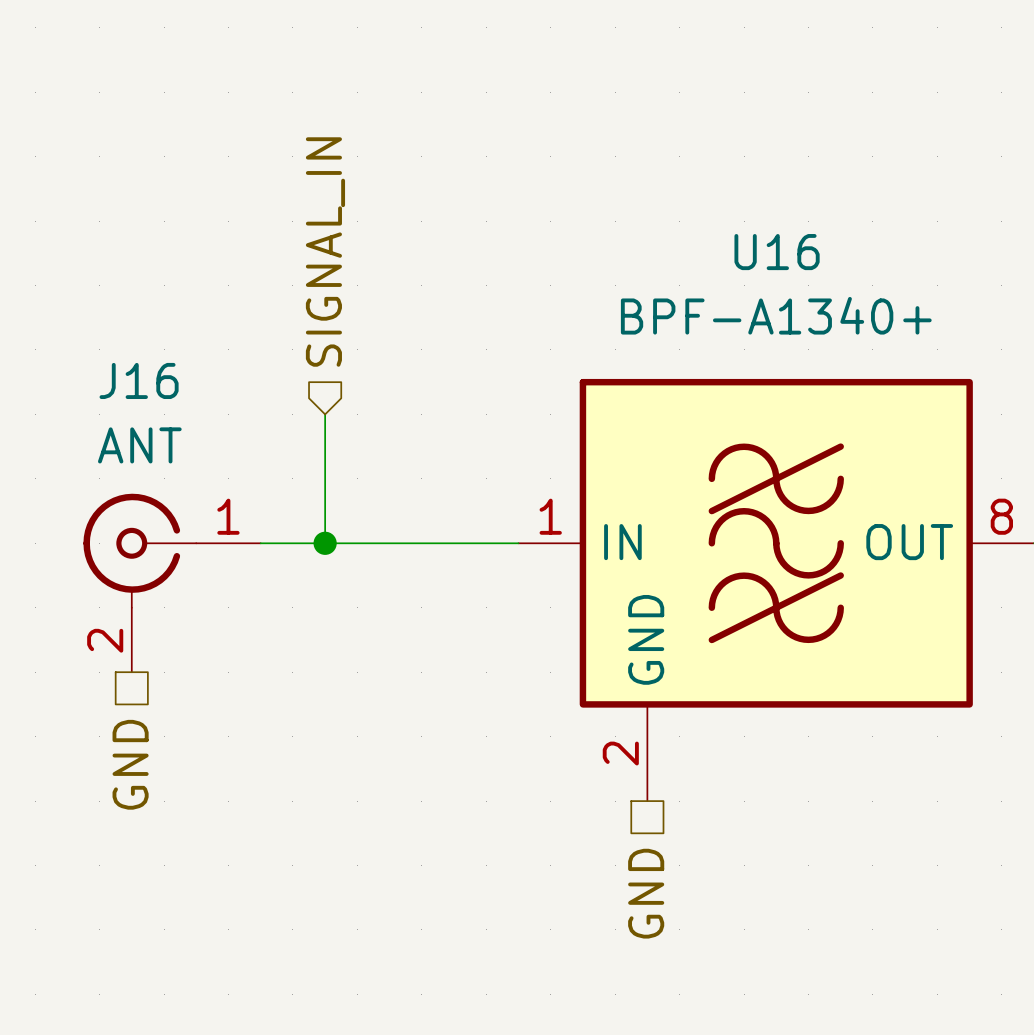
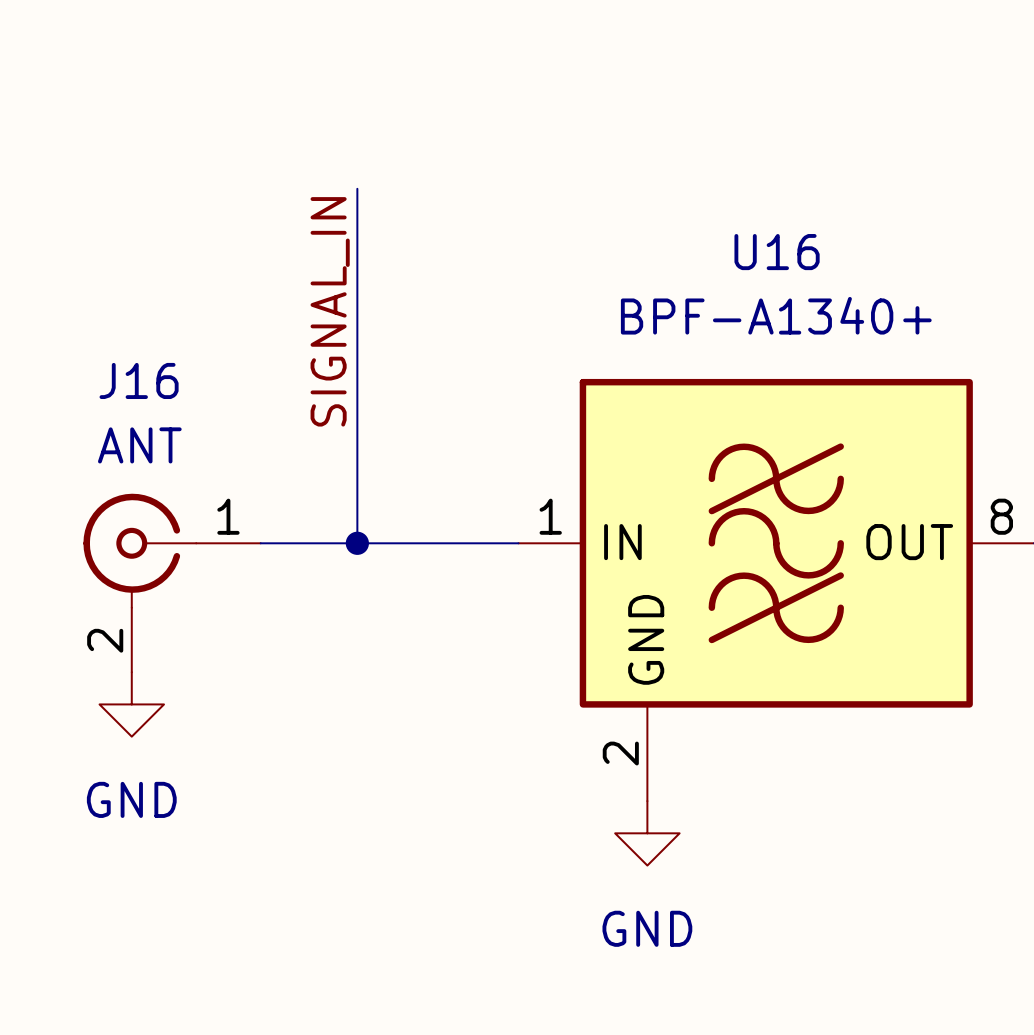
wire: none -> (357, 188) (357, 543)
hierarchical label: SIGNAL_IN (325, 252) -> none
label: none -> SIGNAL_IN (330, 311)
wire: (325, 414) (325, 543) -> none
junction position: (325, 543) -> (357, 543)
power symbol: none -> GND (131, 704)
hierarchical label: GND (130, 764) -> none
power symbol: none -> GND (647, 833)
hierarchical label: GND (646, 893) -> none

